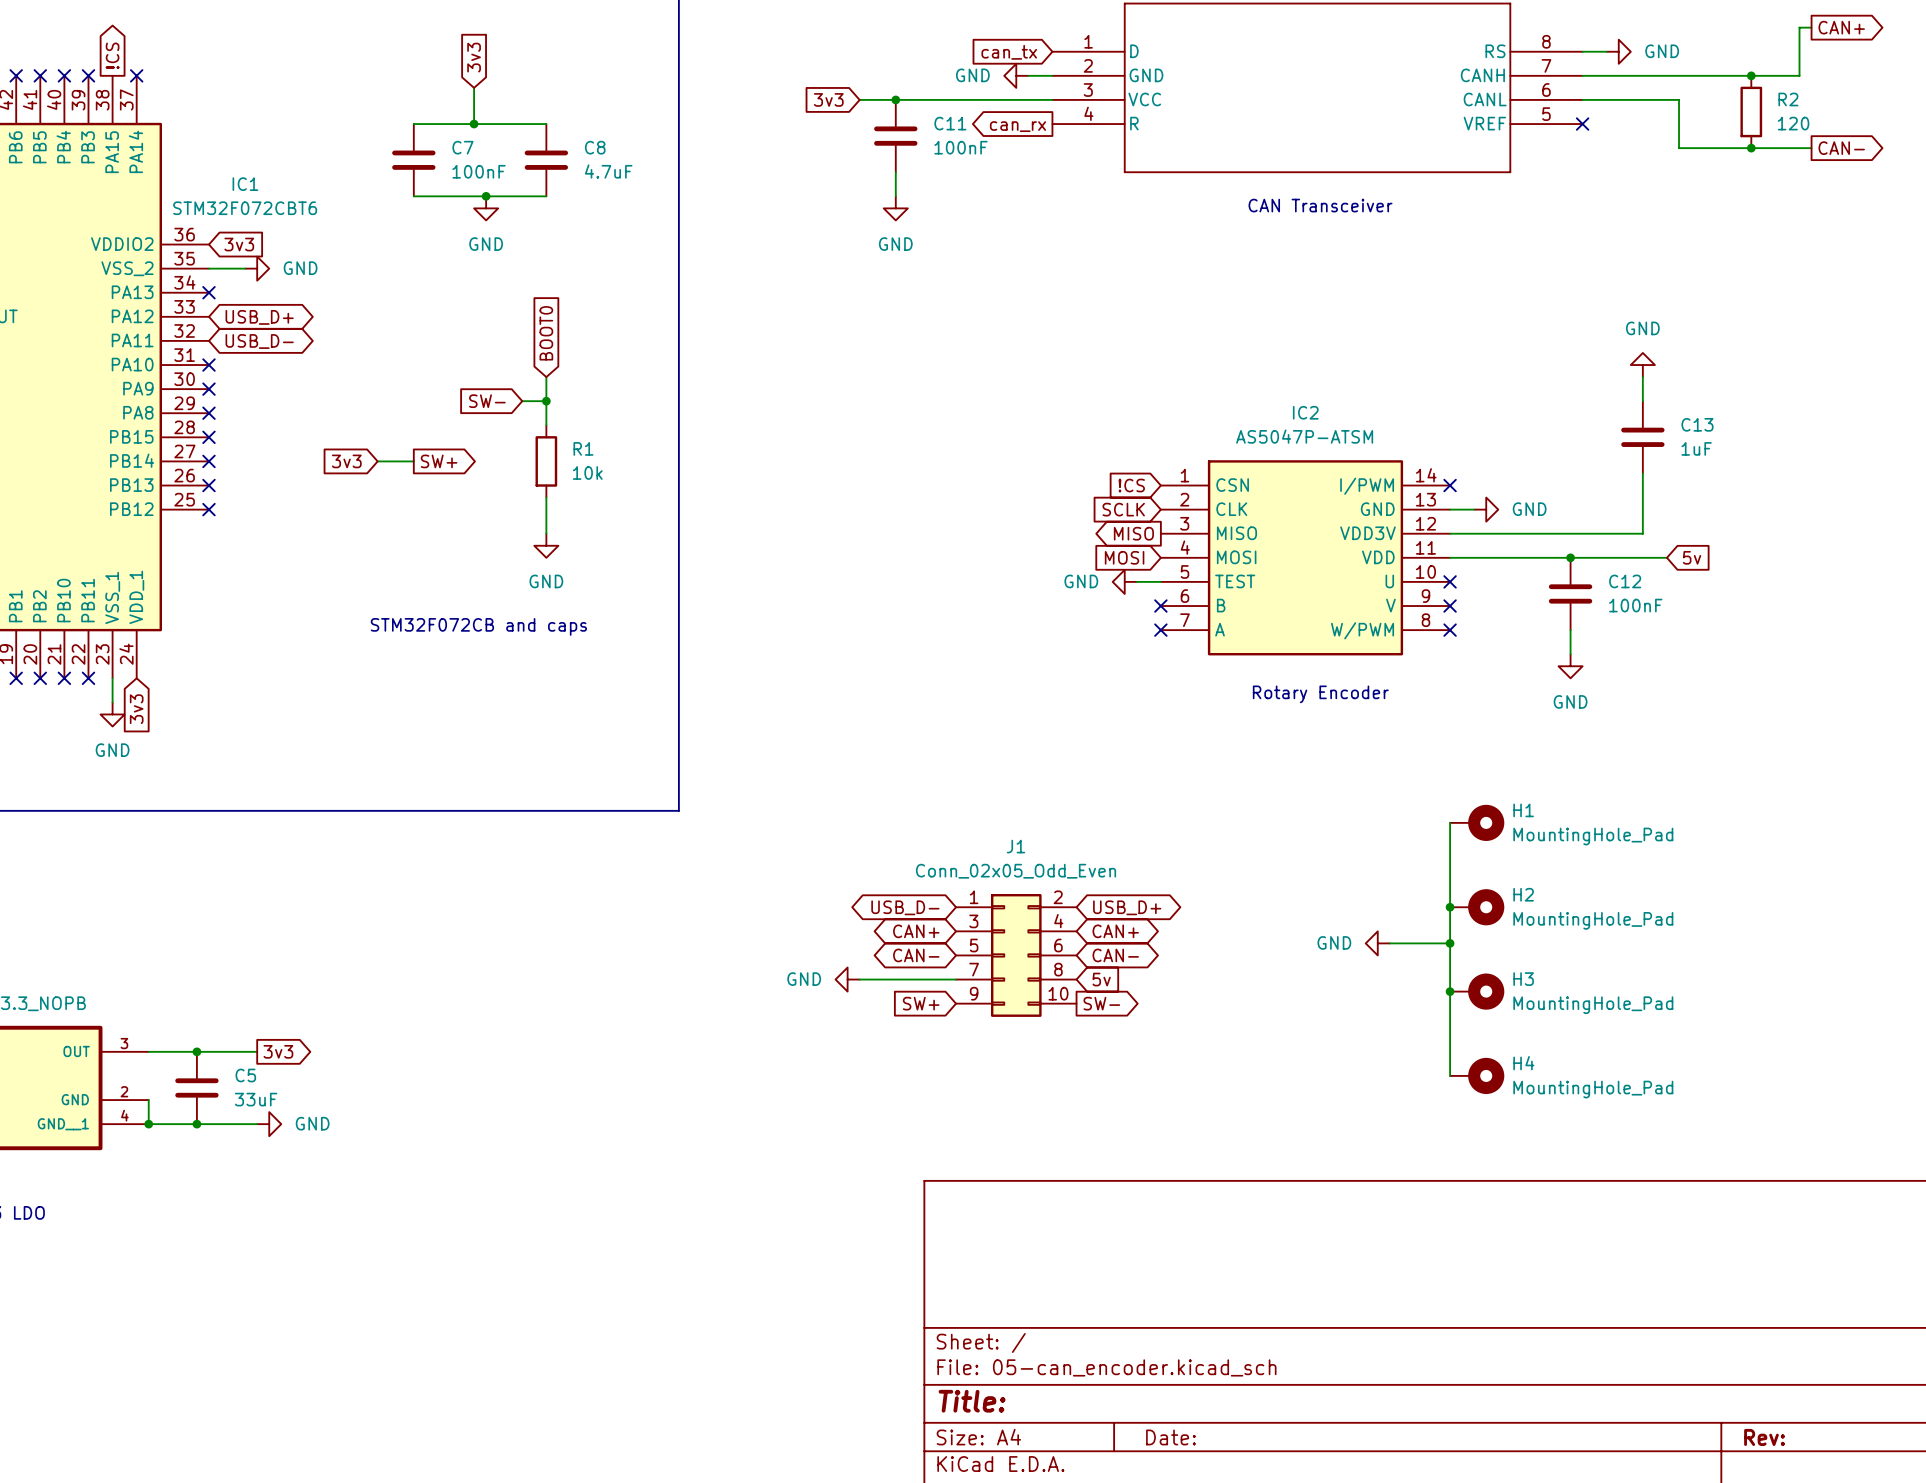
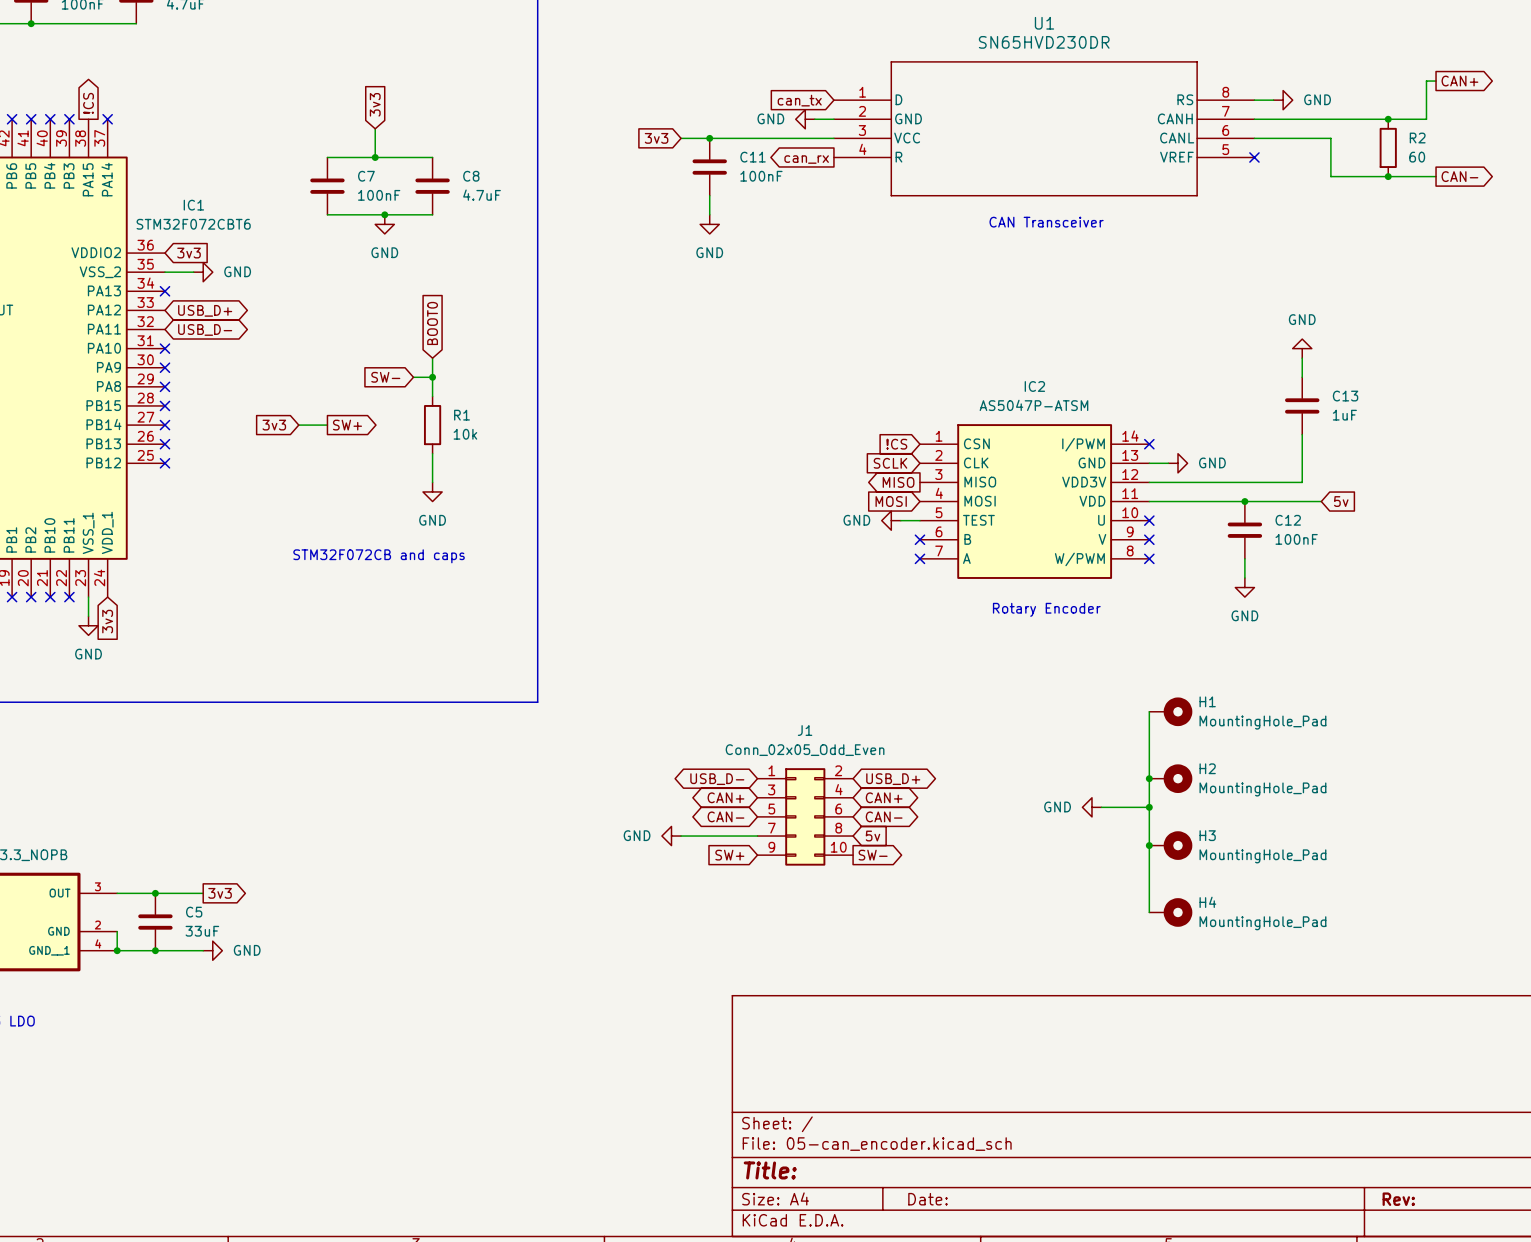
R2 value: 120 (1793, 123) -> 60 (1417, 157)

